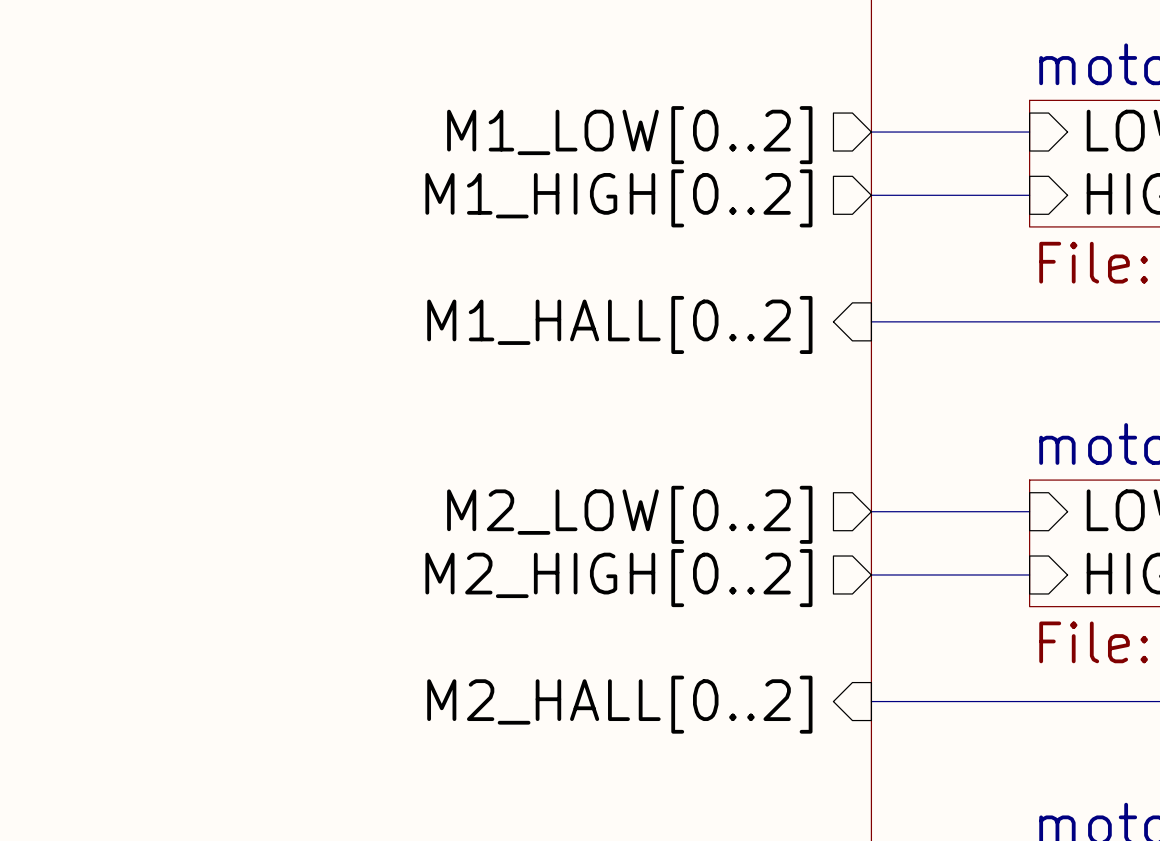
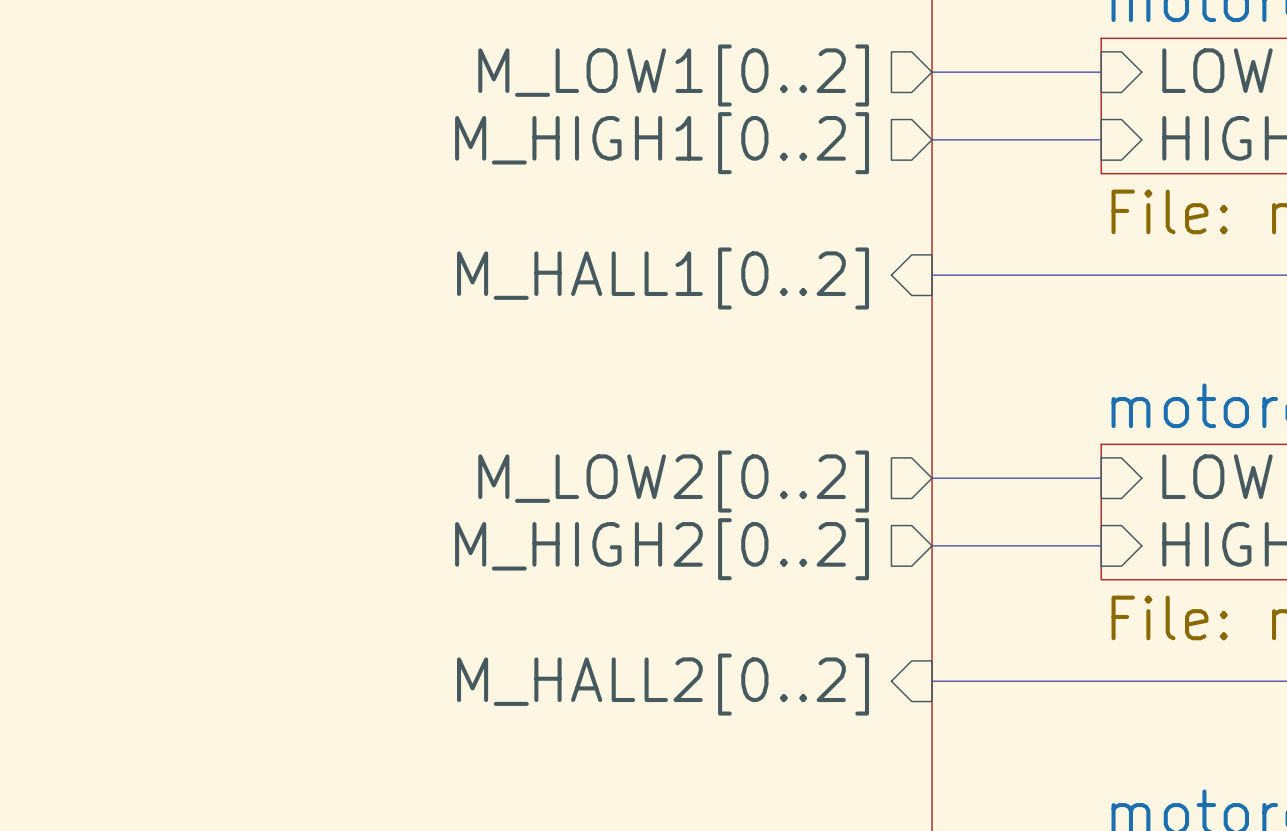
sheet pin: M1_LOW[0..2] (629, 135) -> M_LOW1[0..2] (673, 75)
sheet pin: M1_HIGH[0..2] (618, 198) -> M_HIGH1[0..2] (662, 143)
sheet pin: M1_HALL[0..2] (619, 324) -> M_HALL1[0..2] (663, 278)
sheet pin: M2_LOW[0..2] (629, 514) -> M_LOW2[0..2] (673, 481)
sheet pin: M2_HIGH[0..2] (618, 578) -> M_HIGH2[0..2] (662, 549)
sheet pin: M2_HALL[0..2] (619, 704) -> M_HALL2[0..2] (663, 684)

